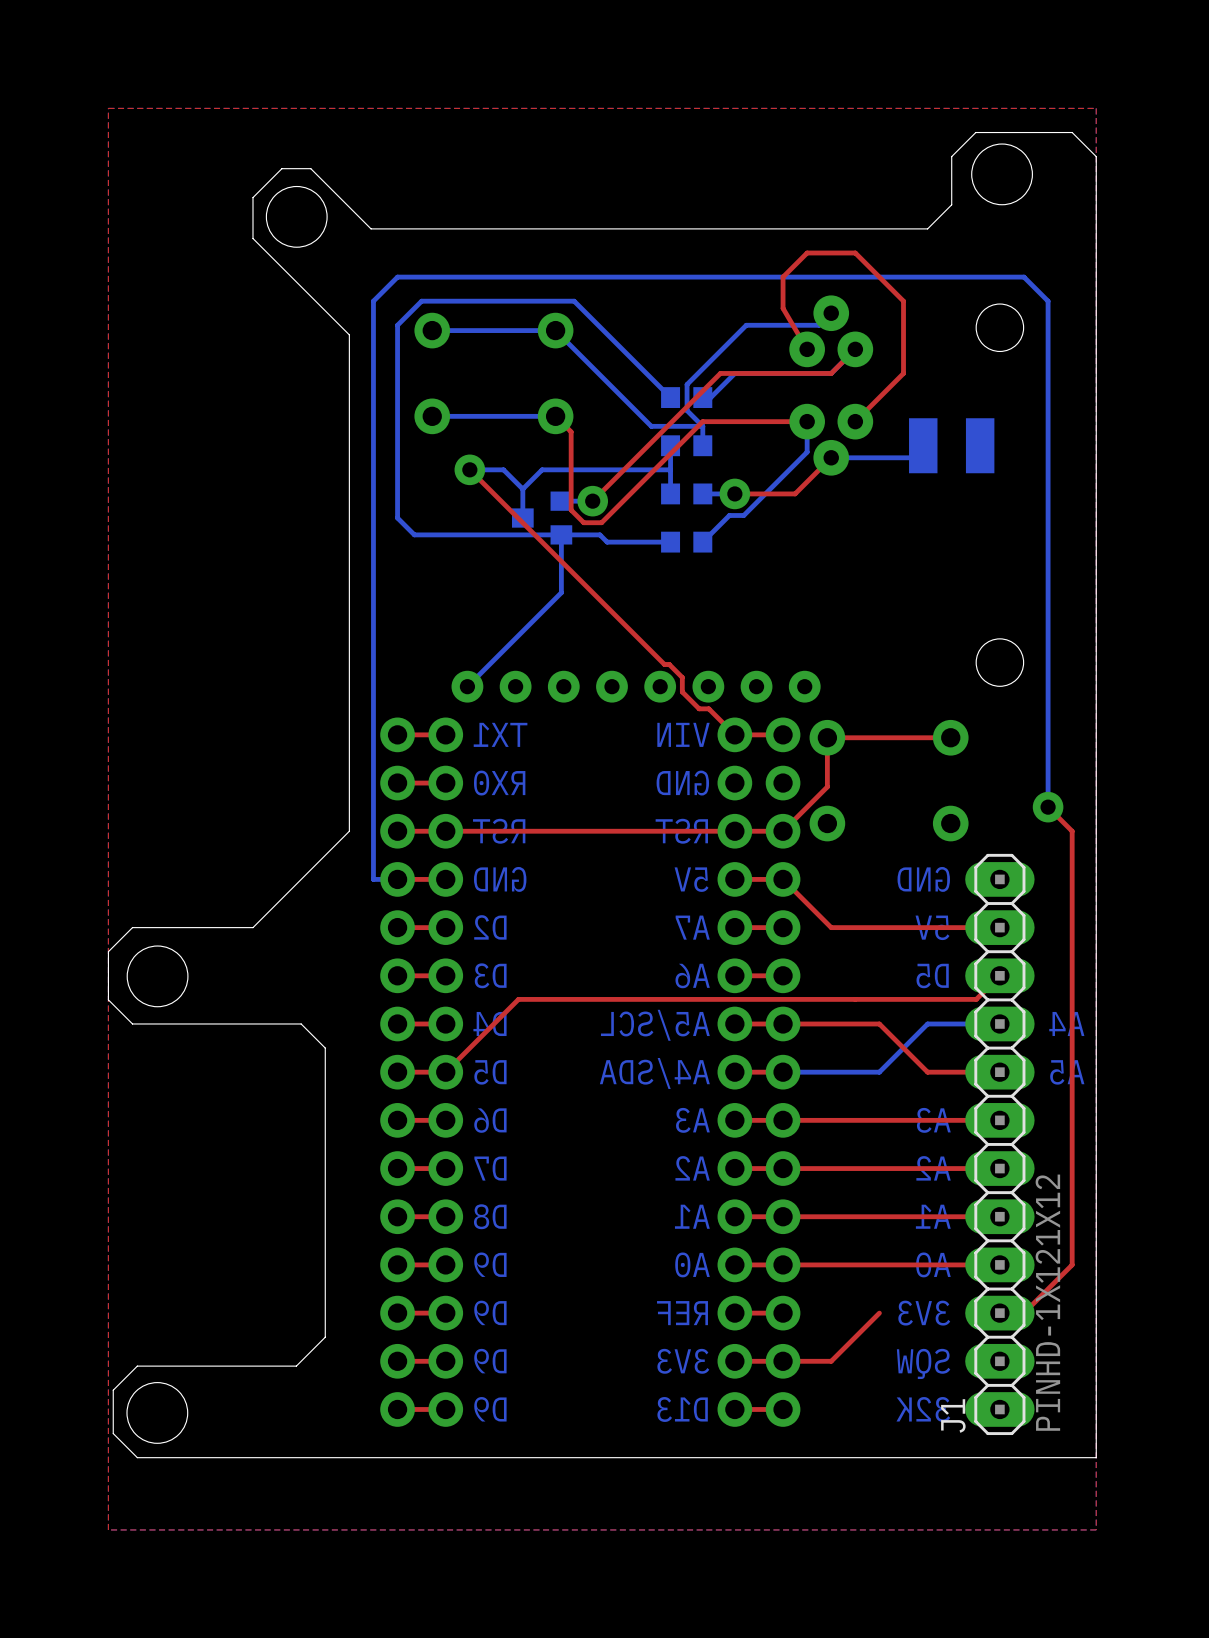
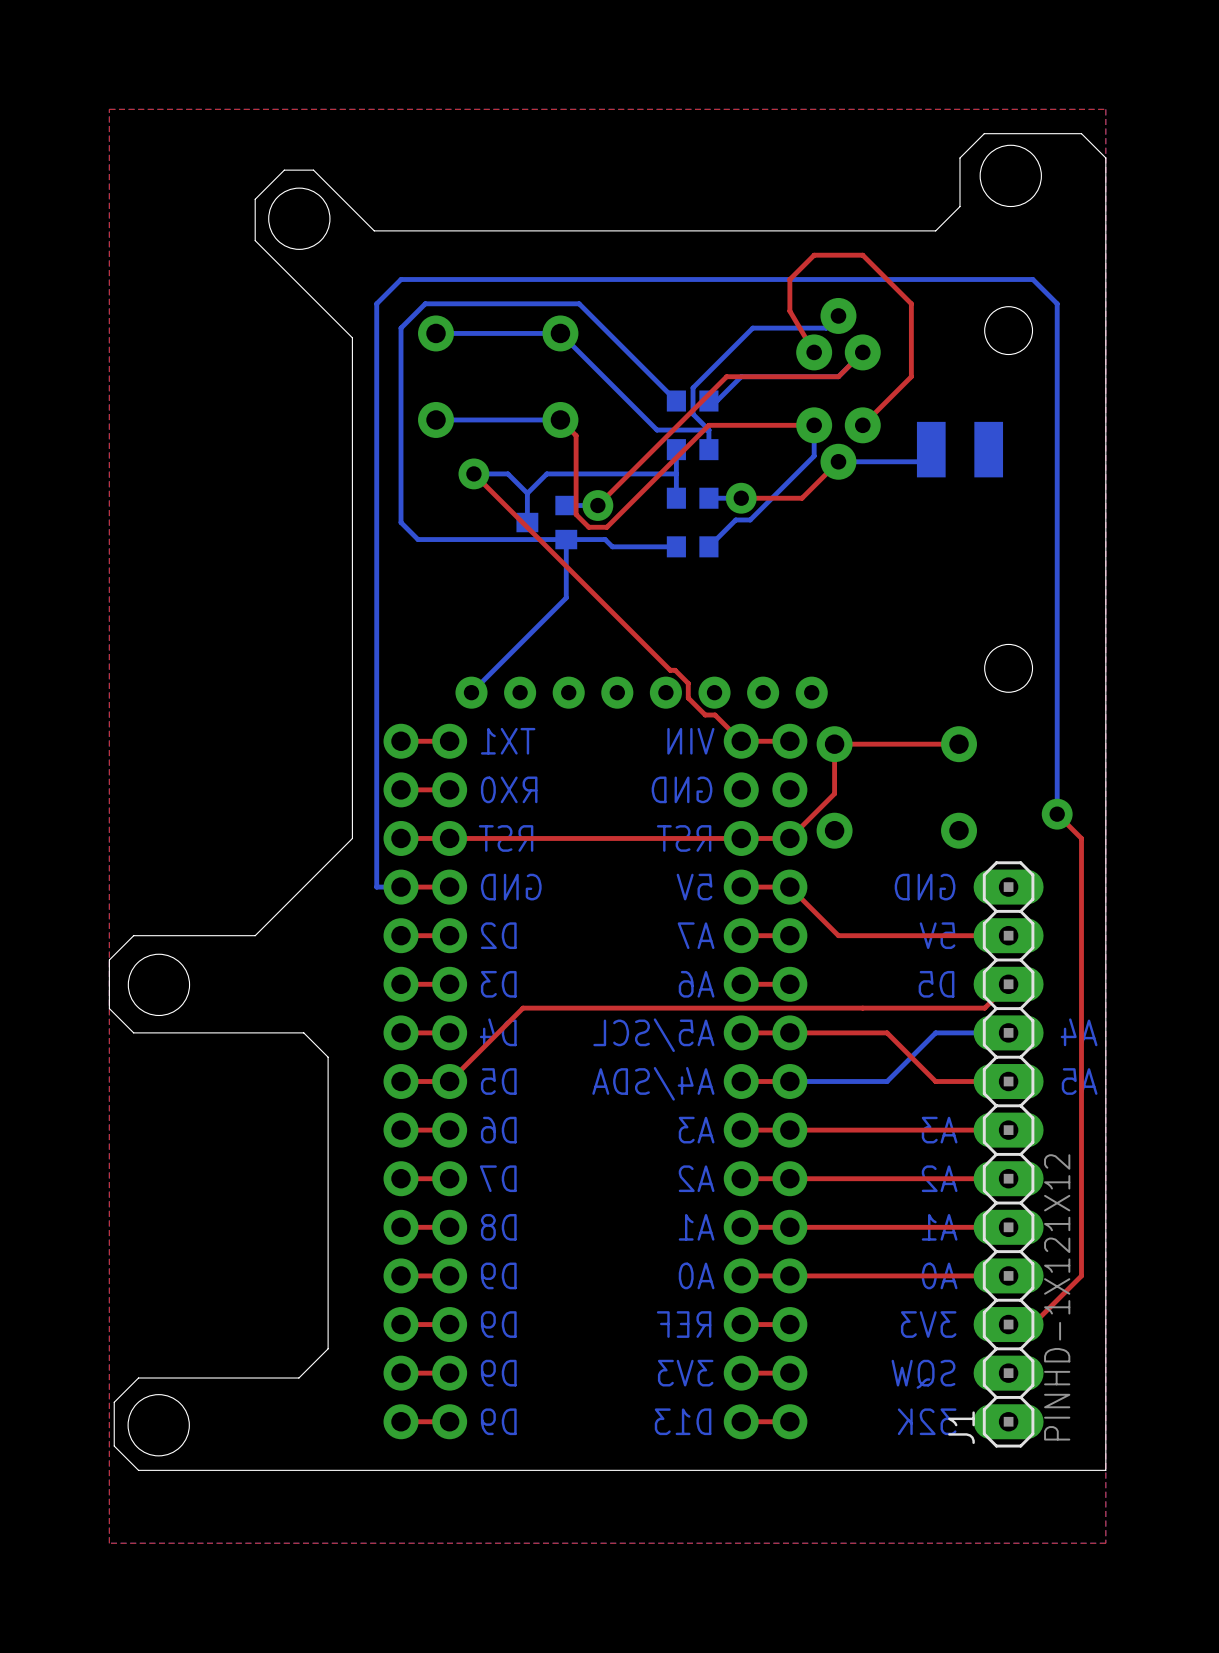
top track: (879, 1313) (831, 1361) (783, 1361) -> none

